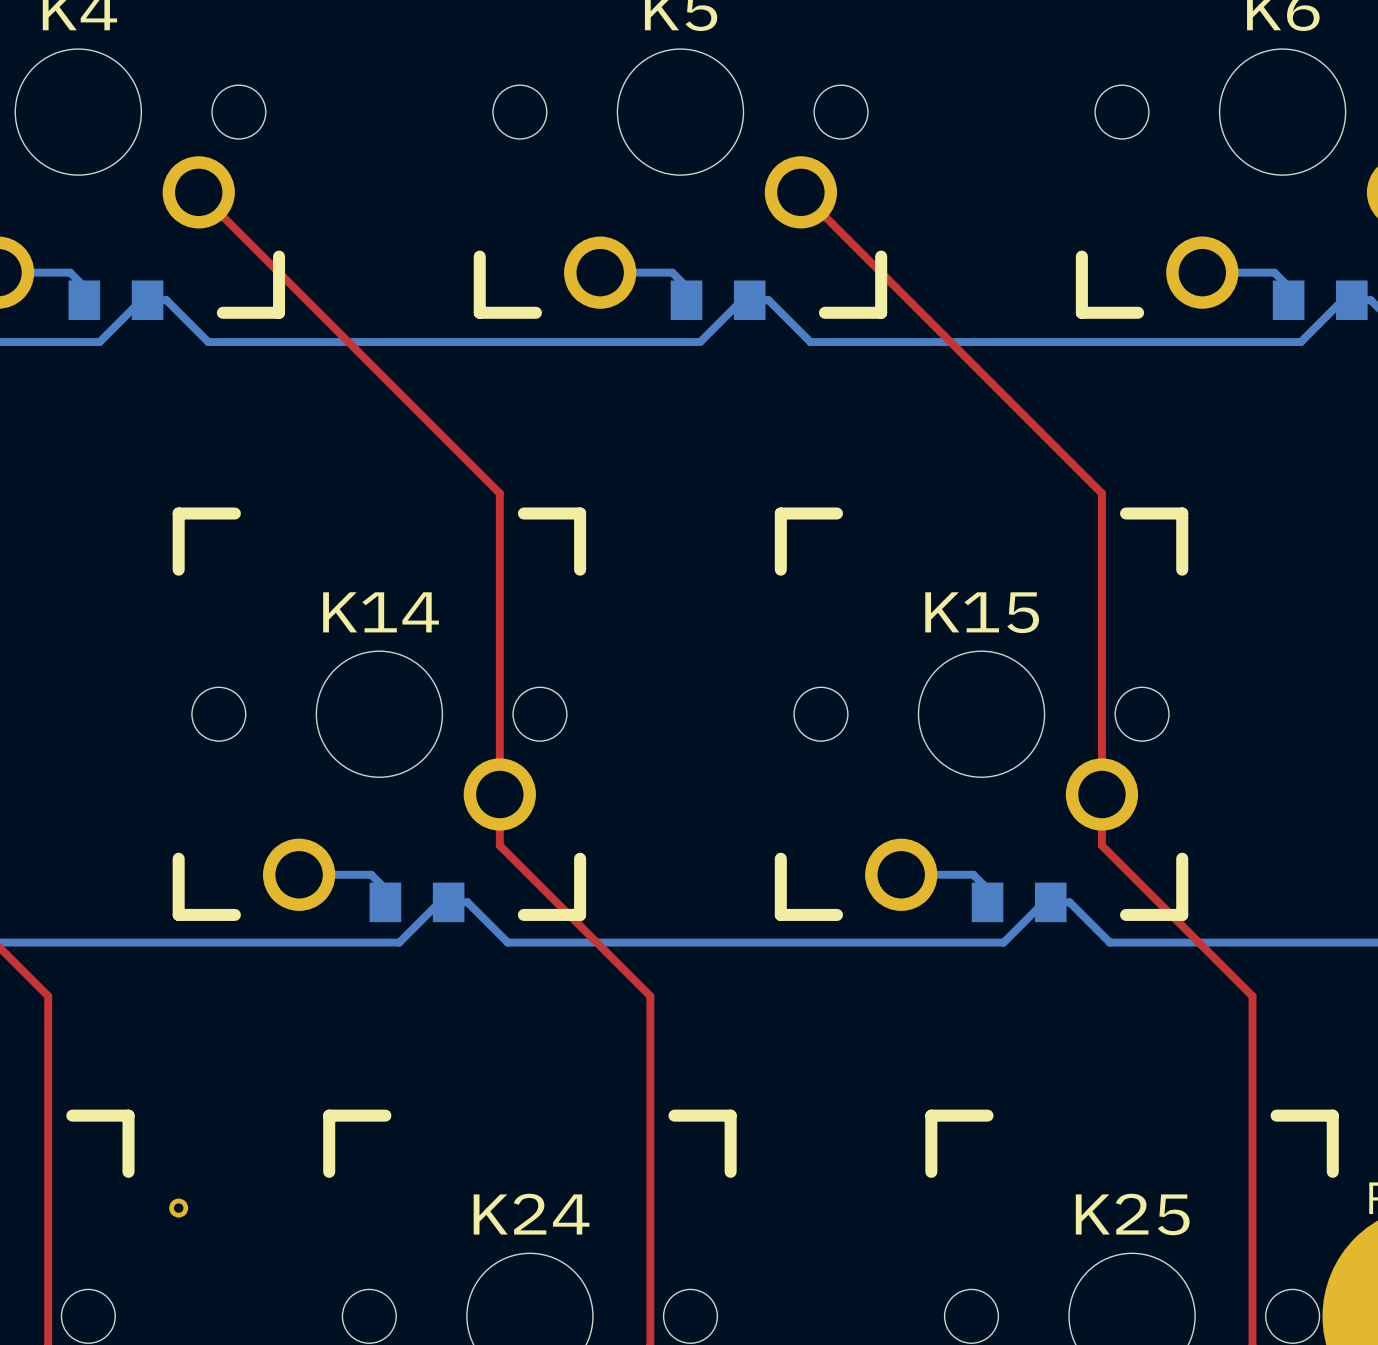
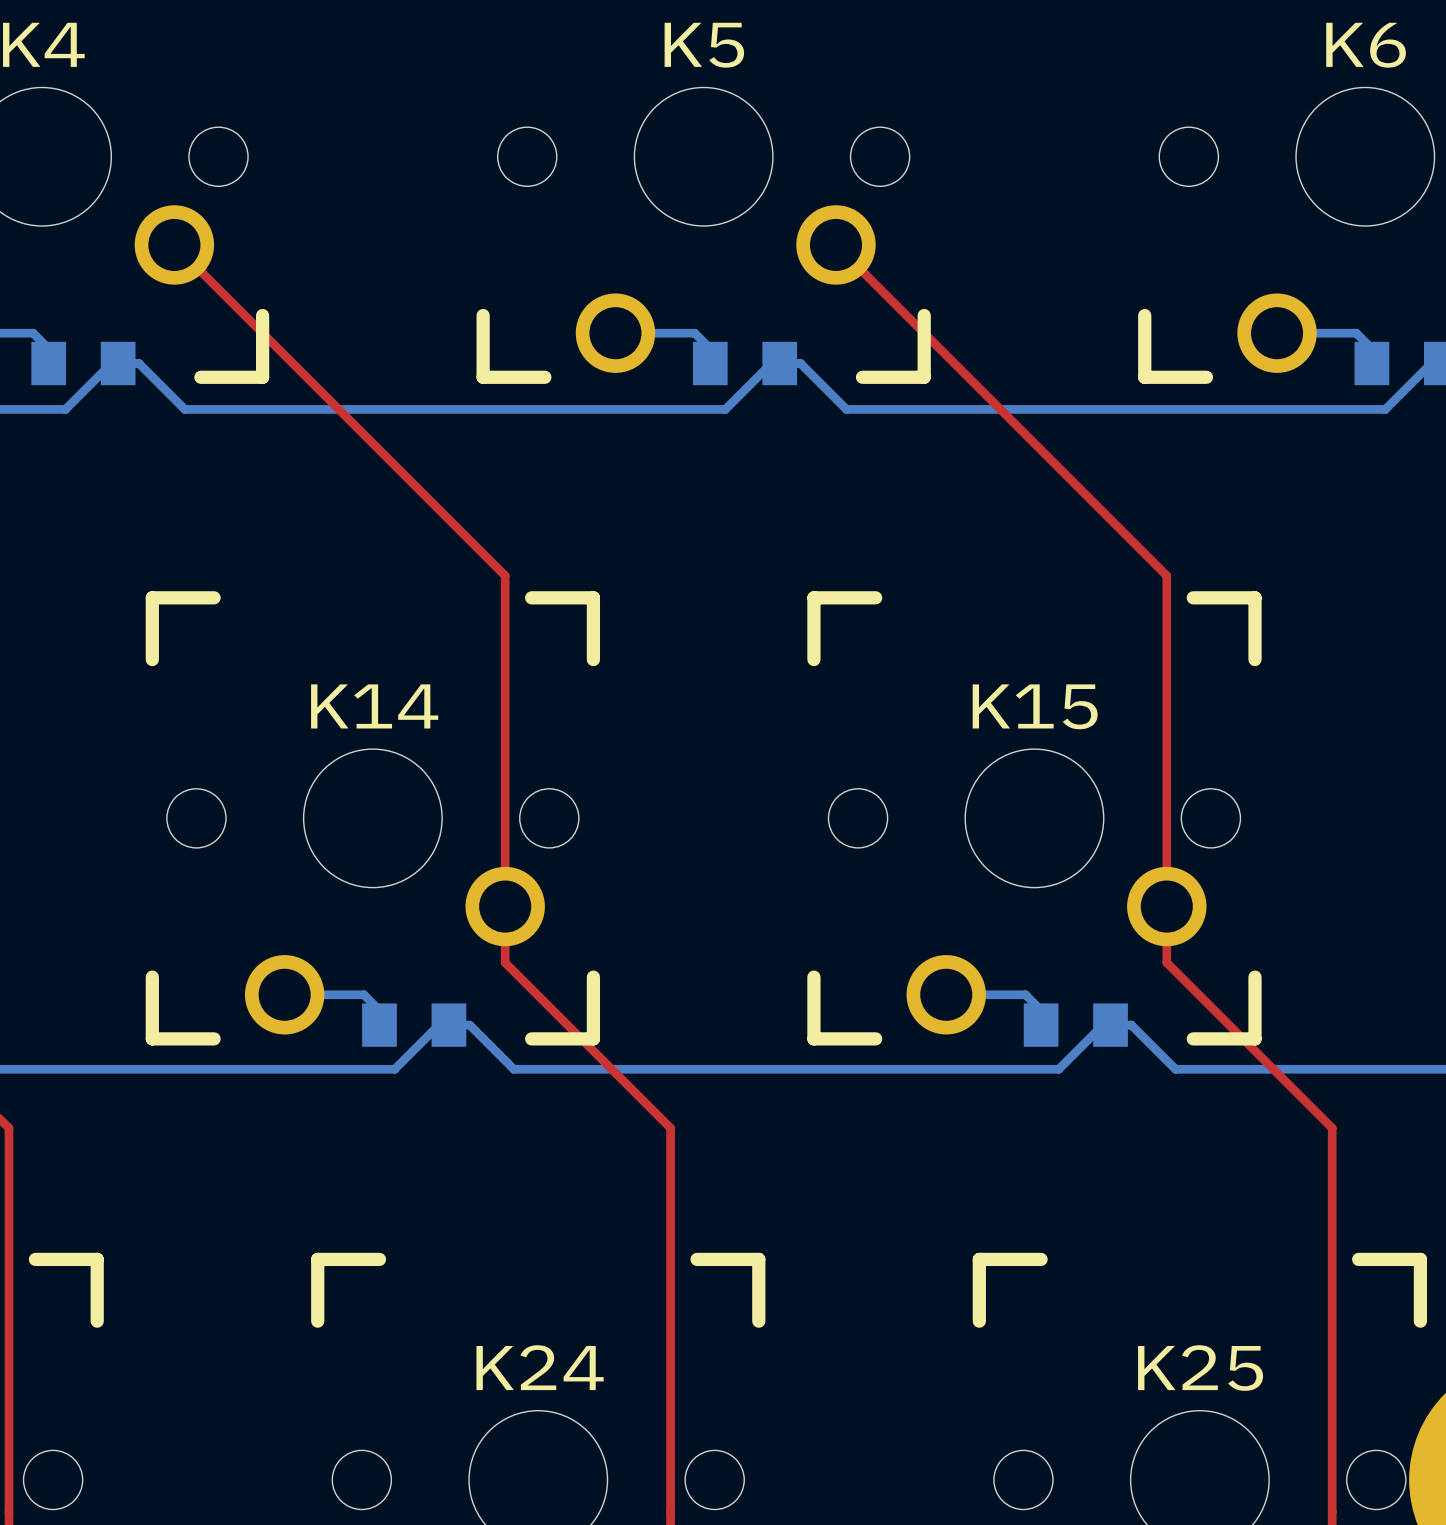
part: (178, 1208) -> none

